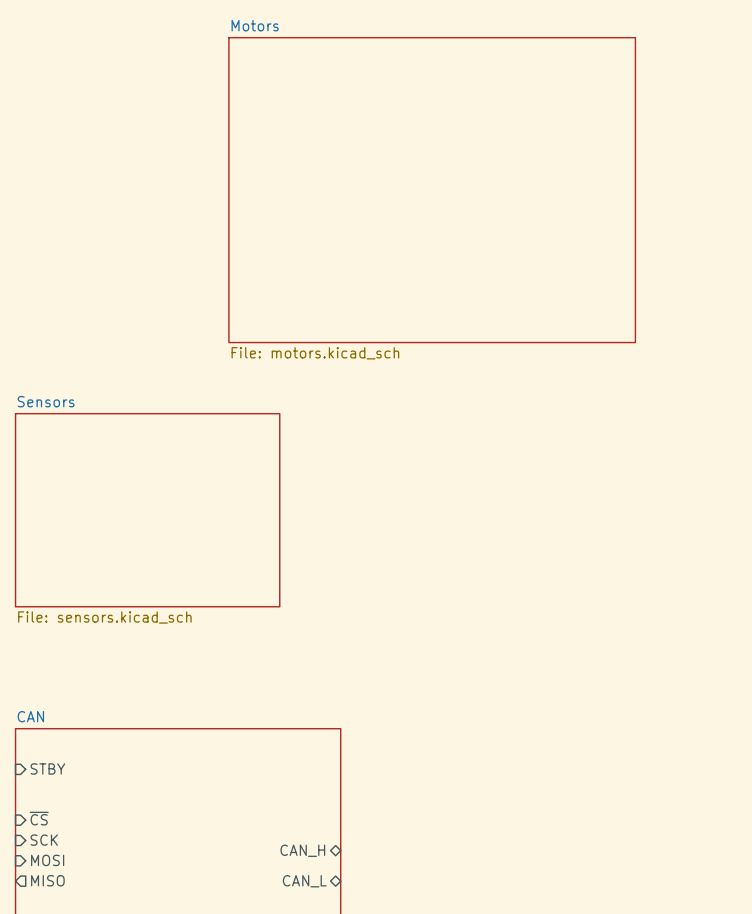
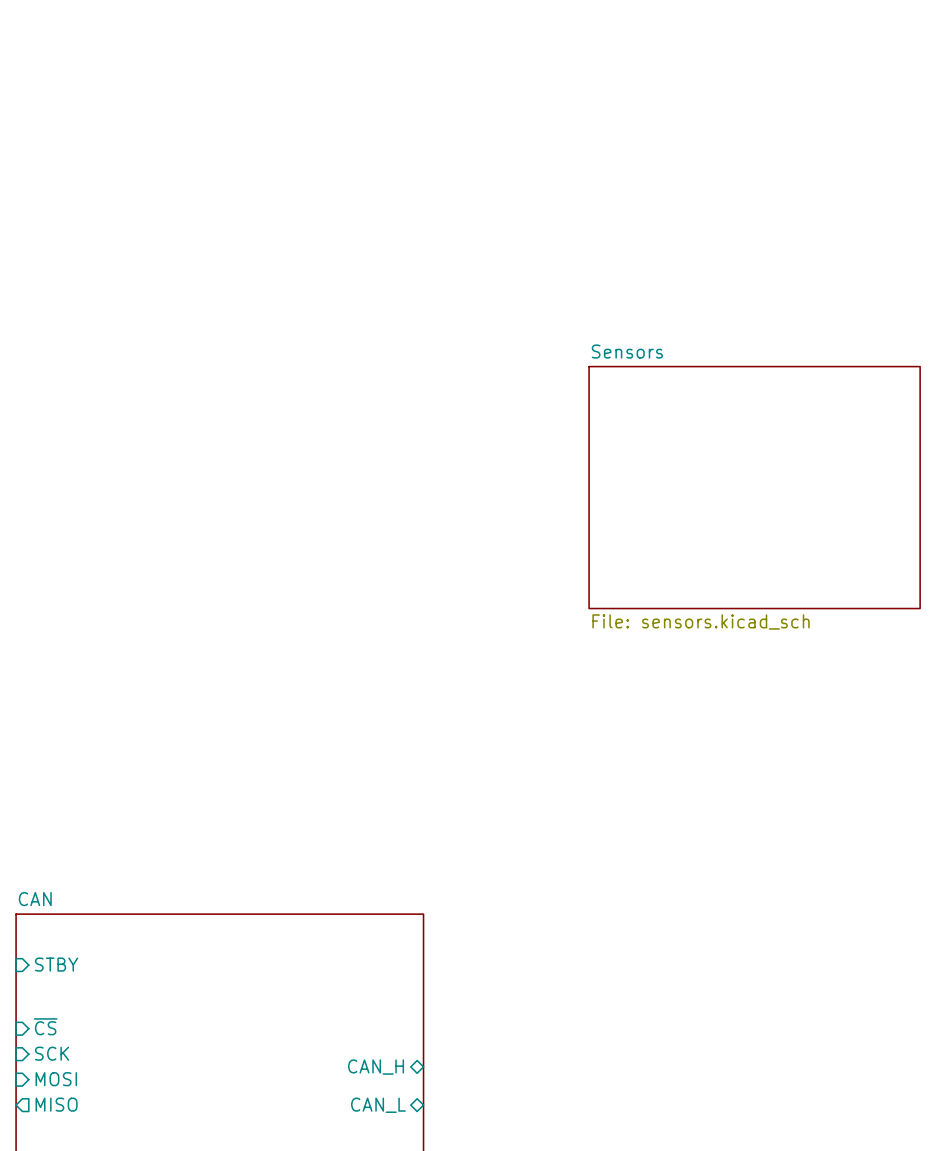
sheet Motors: File: motors.kicad_sch (432, 190) -> none
sheet Sensors: none -> File: sensors.kicad_sch (754, 487)
sheet Sensors: File: sensors.kicad_sch (147, 510) -> none

